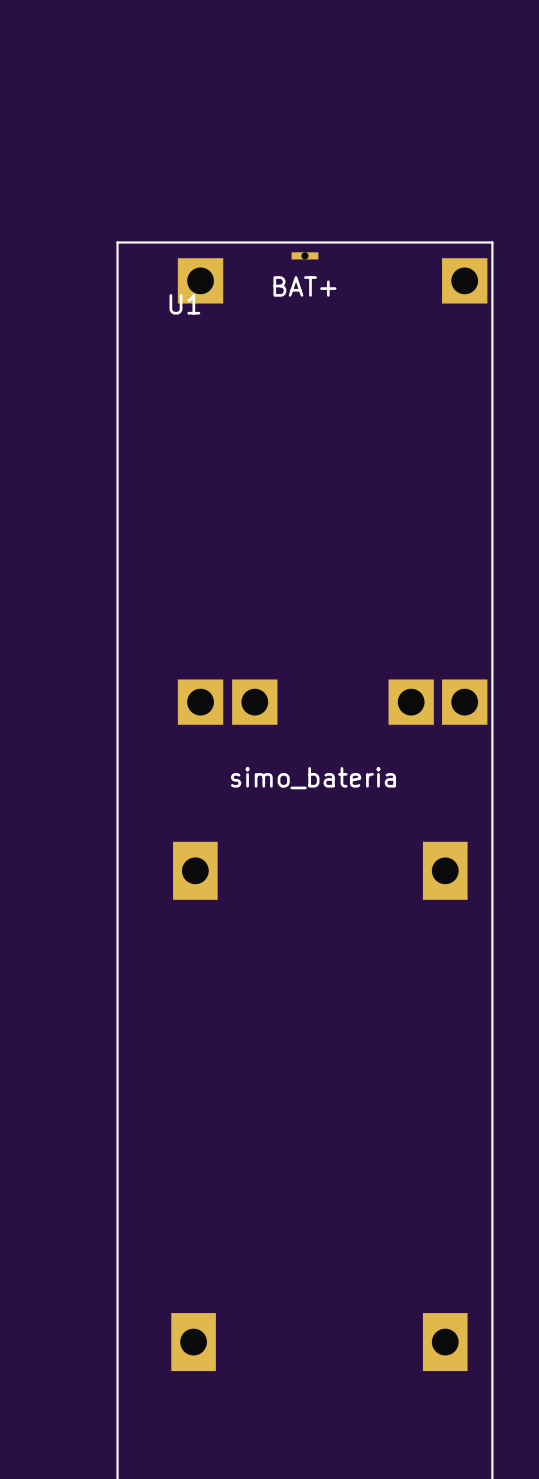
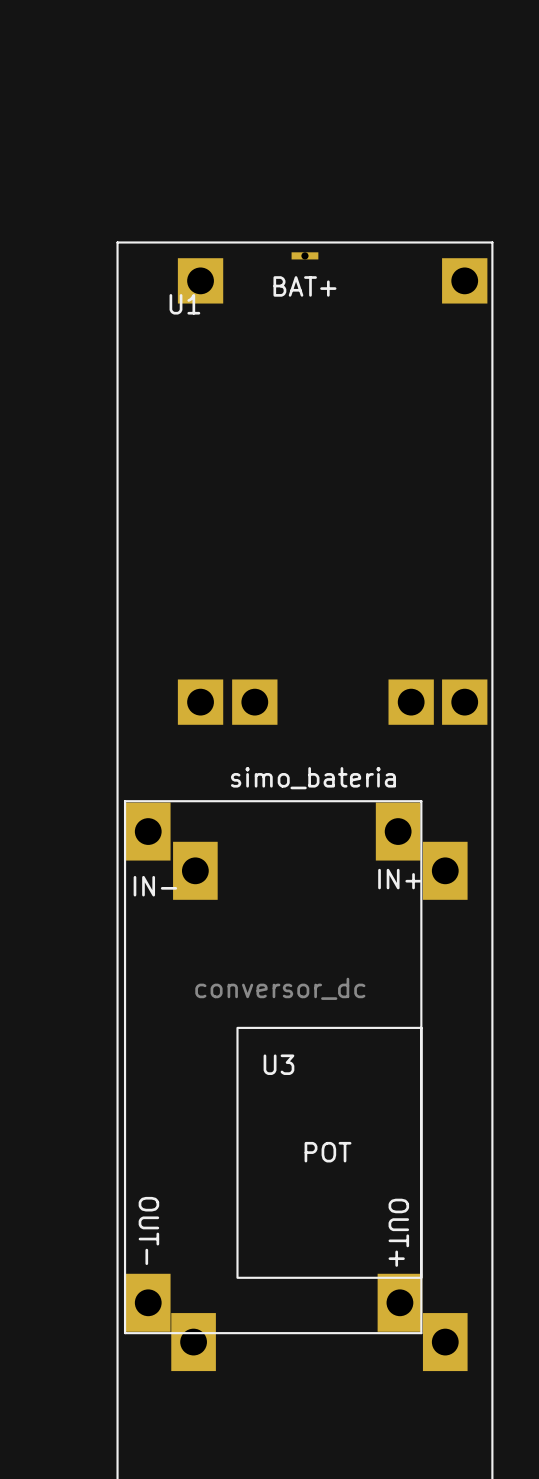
U3: none -> conversor_dc (273, 1067)

